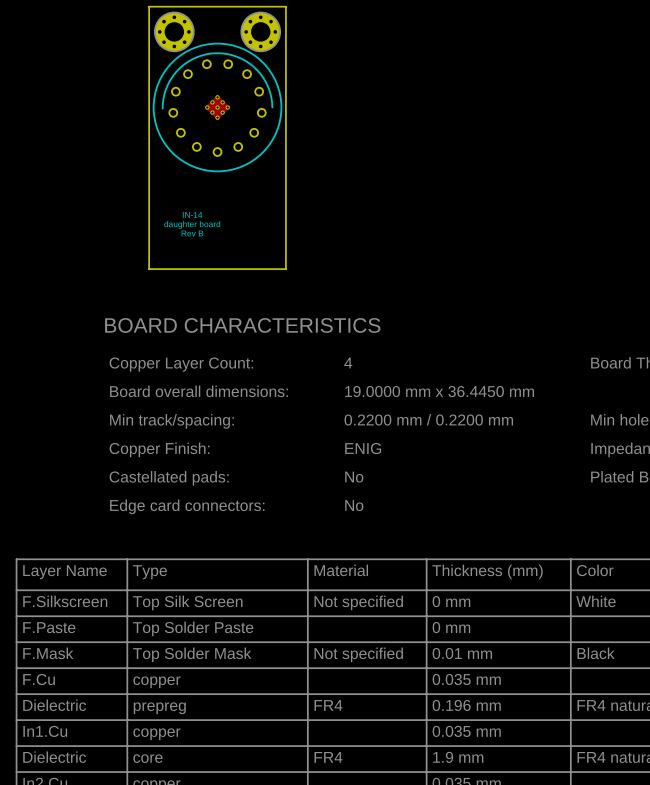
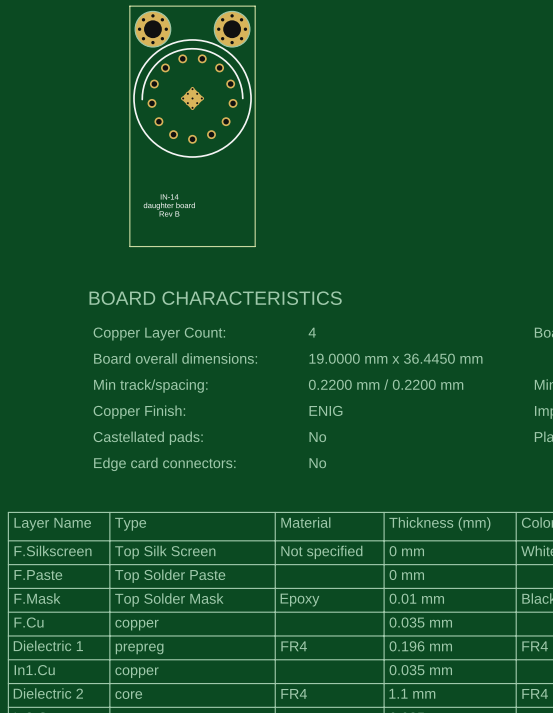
text: Not specified (358, 654) -> Epoxy (300, 600)
text: Dielectric (54, 705) -> Dielectric 1 (48, 645)
text: Dielectric (54, 757) -> Dielectric 2 (48, 693)
text: 1.9 mm (458, 757) -> 1.1 mm (412, 693)

